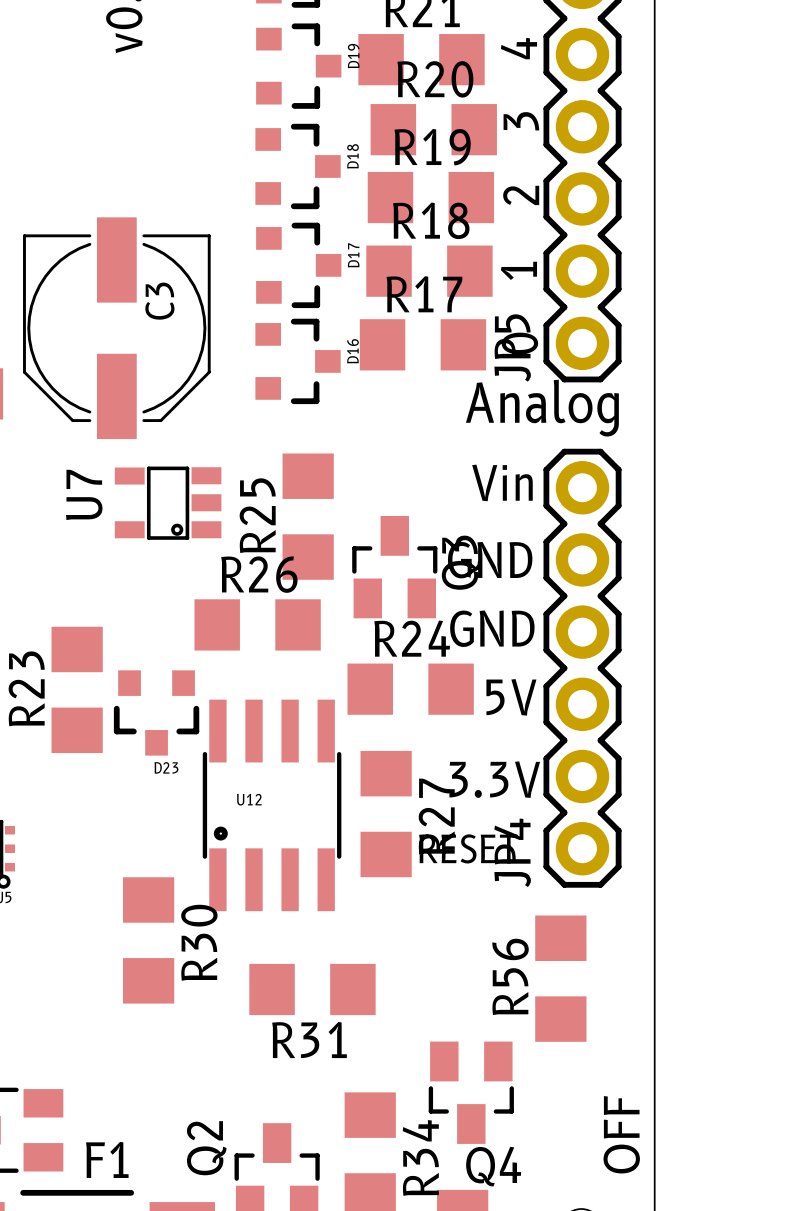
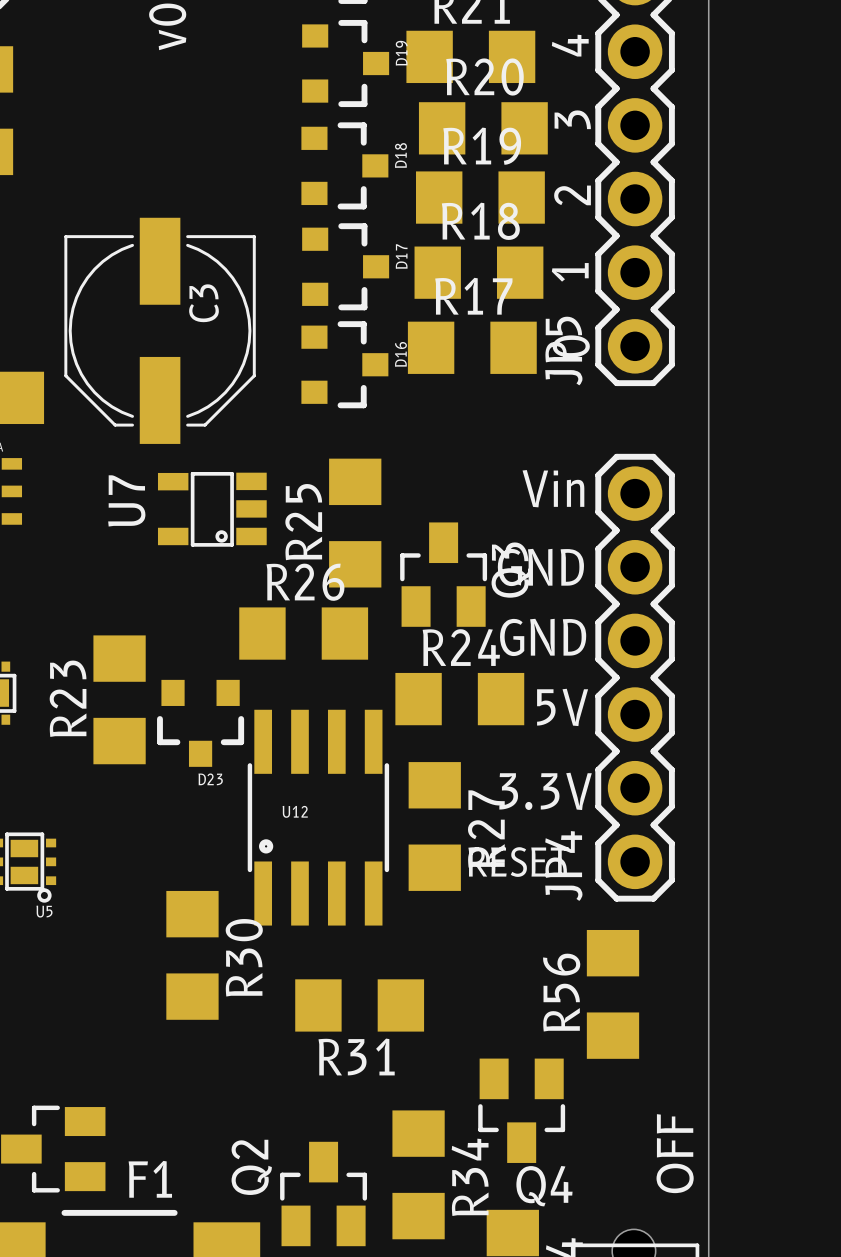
text: Analog (542, 408) -> none

